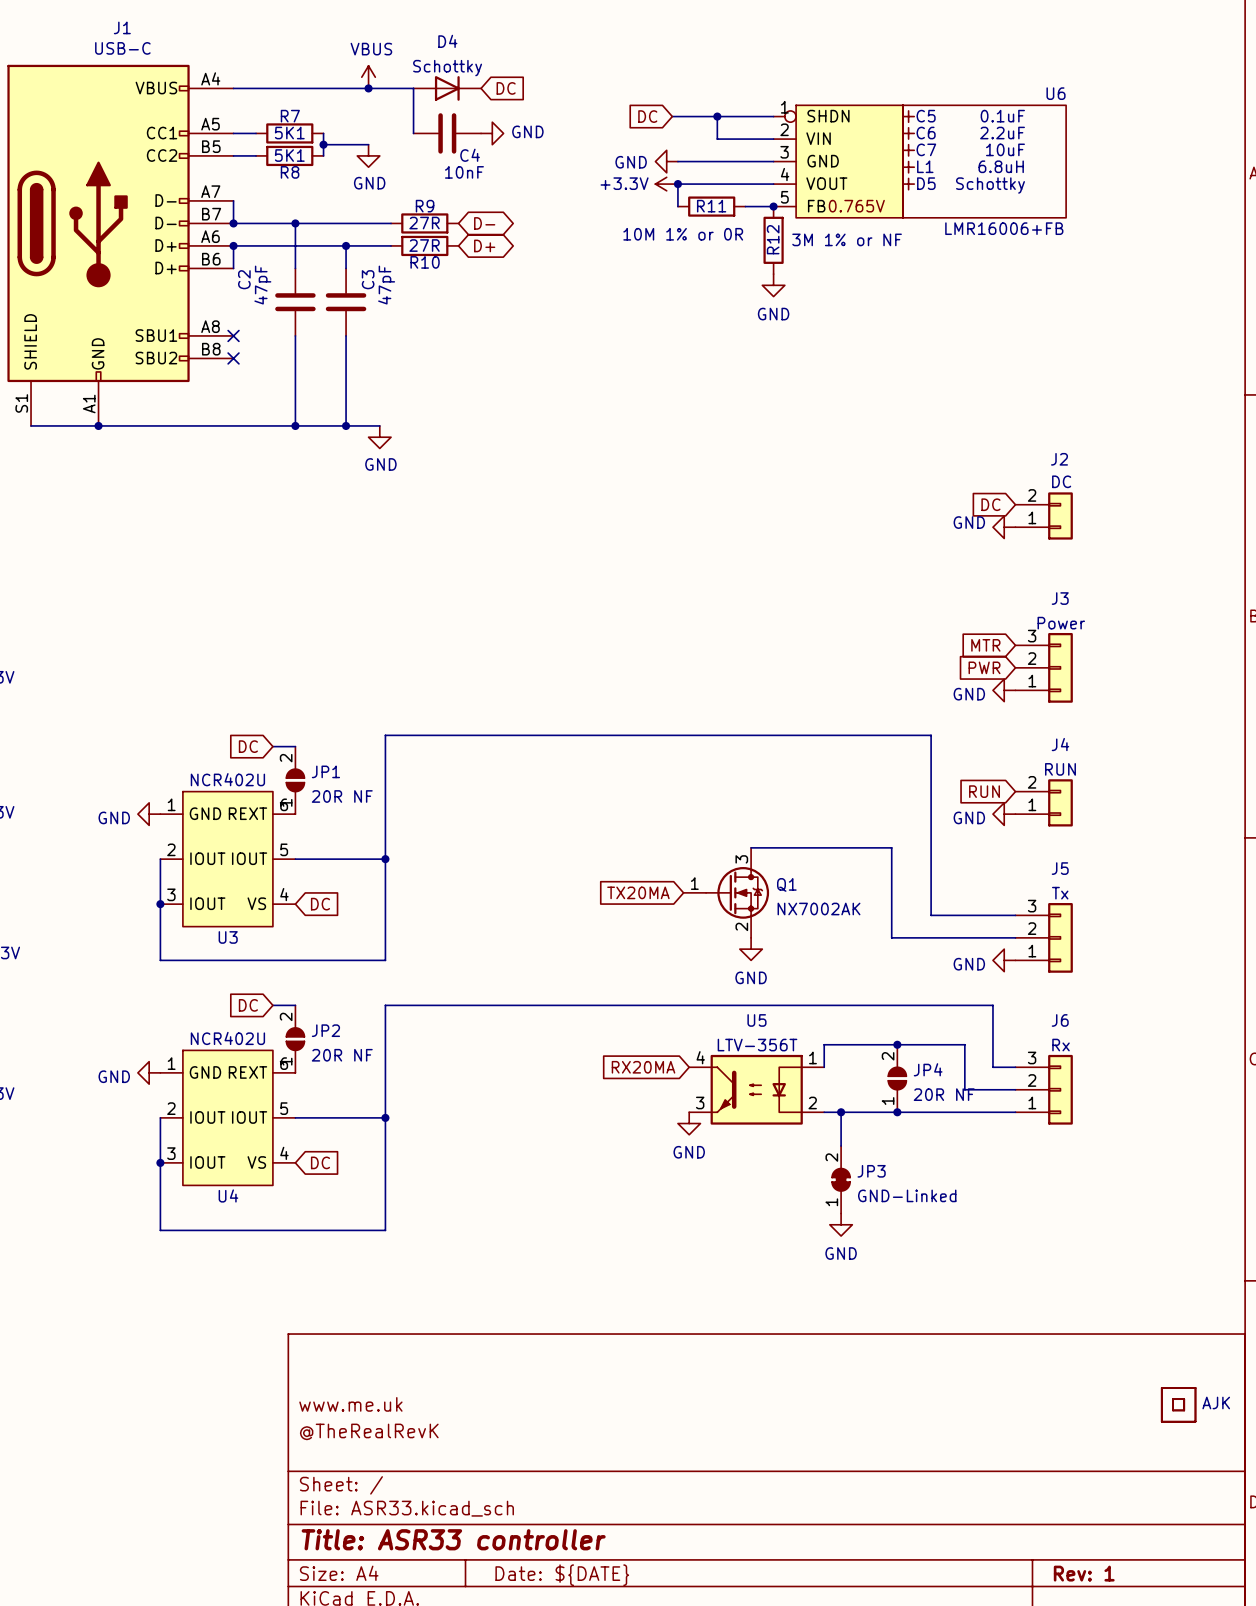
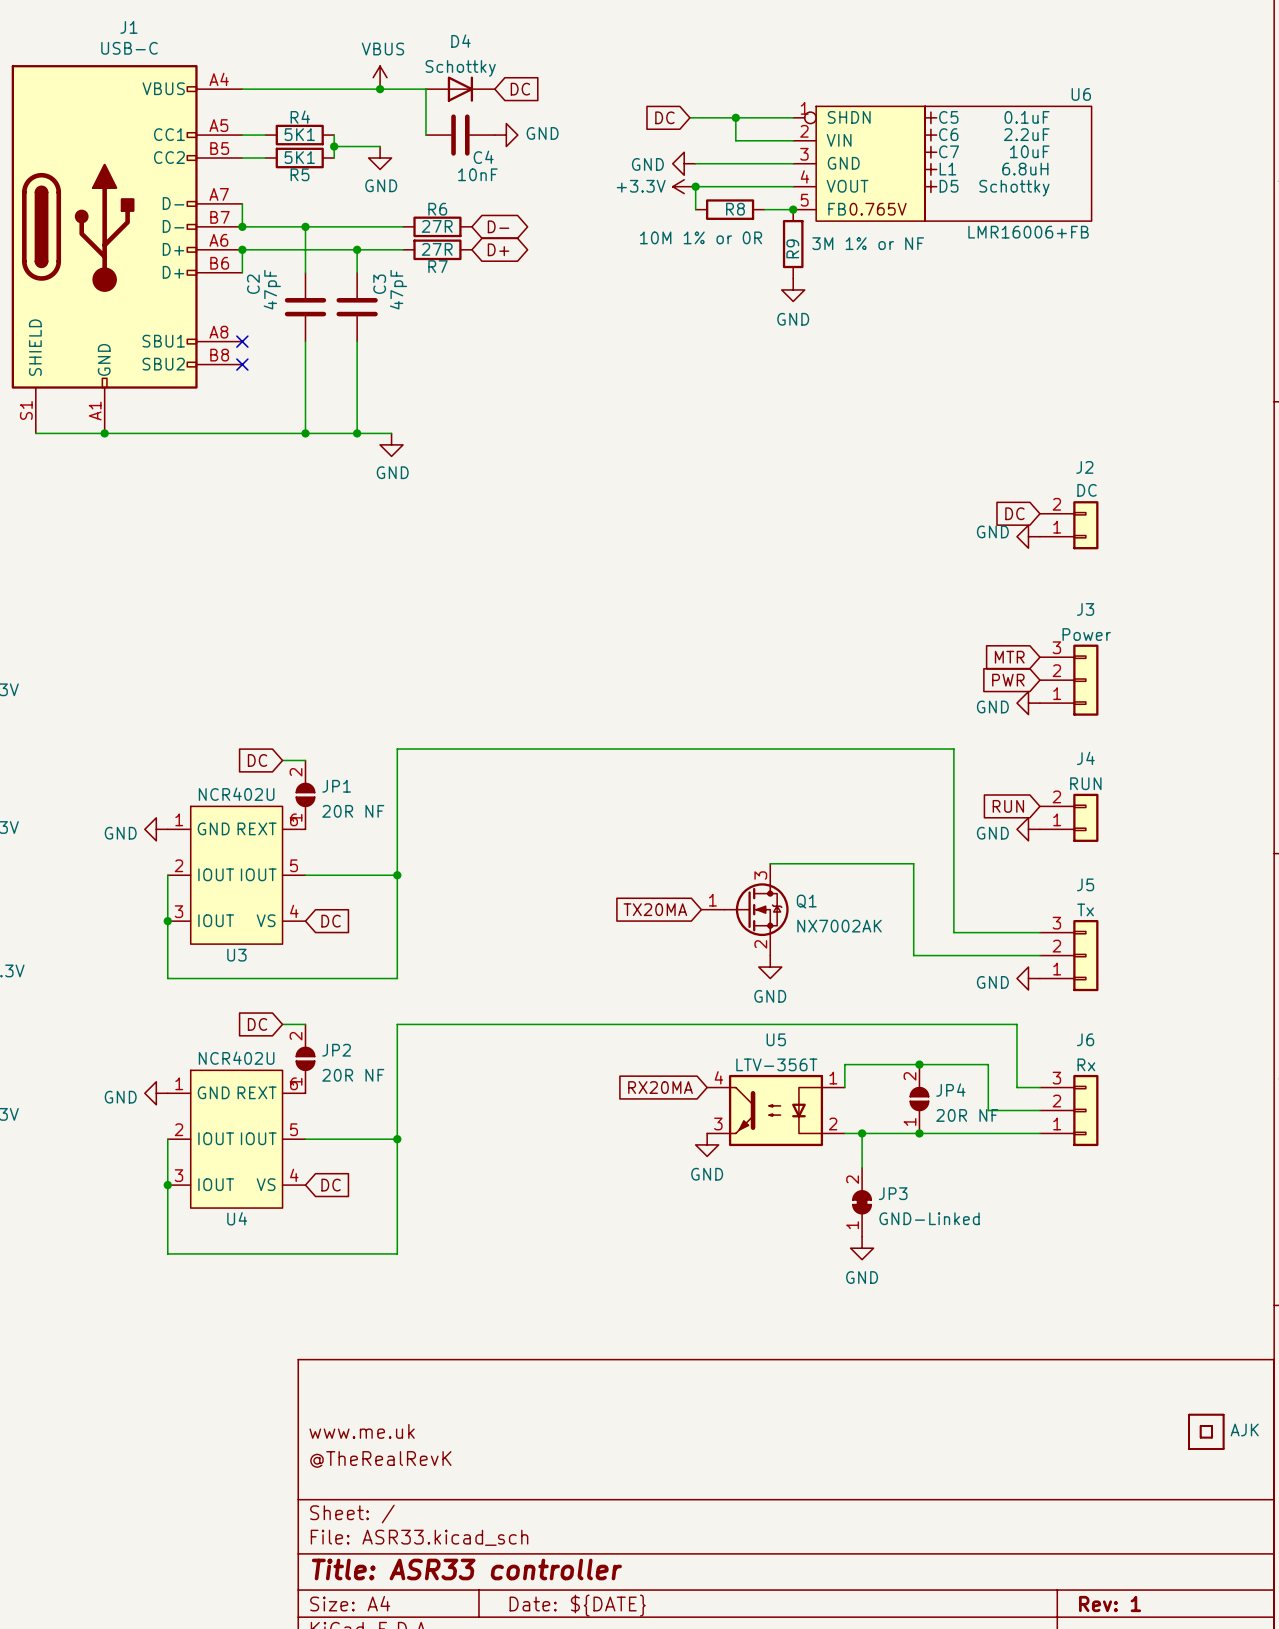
R7 name: R7 (290, 116) -> R4 (300, 117)
R8 name: R8 (290, 172) -> R5 (300, 174)
R9 name: R9 (425, 206) -> R6 (437, 209)
R11 name: R11 (711, 206) -> R8 (735, 209)
R12 name: R12 (773, 239) -> R9 (792, 248)
R10 name: R10 (425, 262) -> R7 (438, 266)

